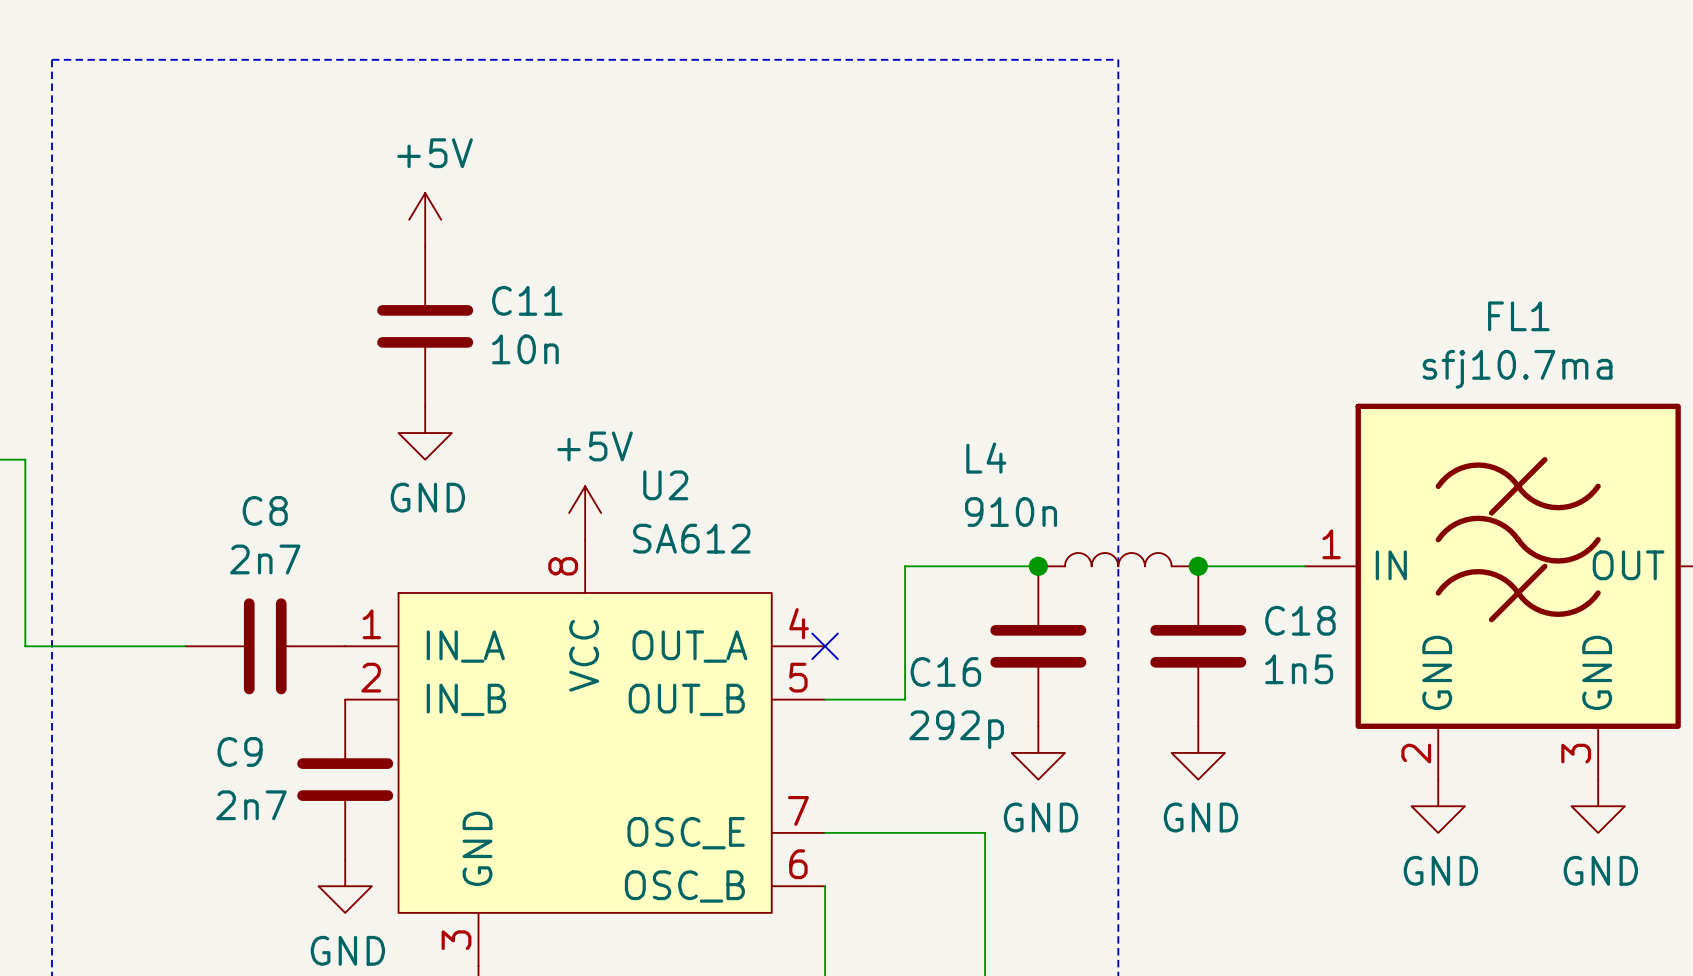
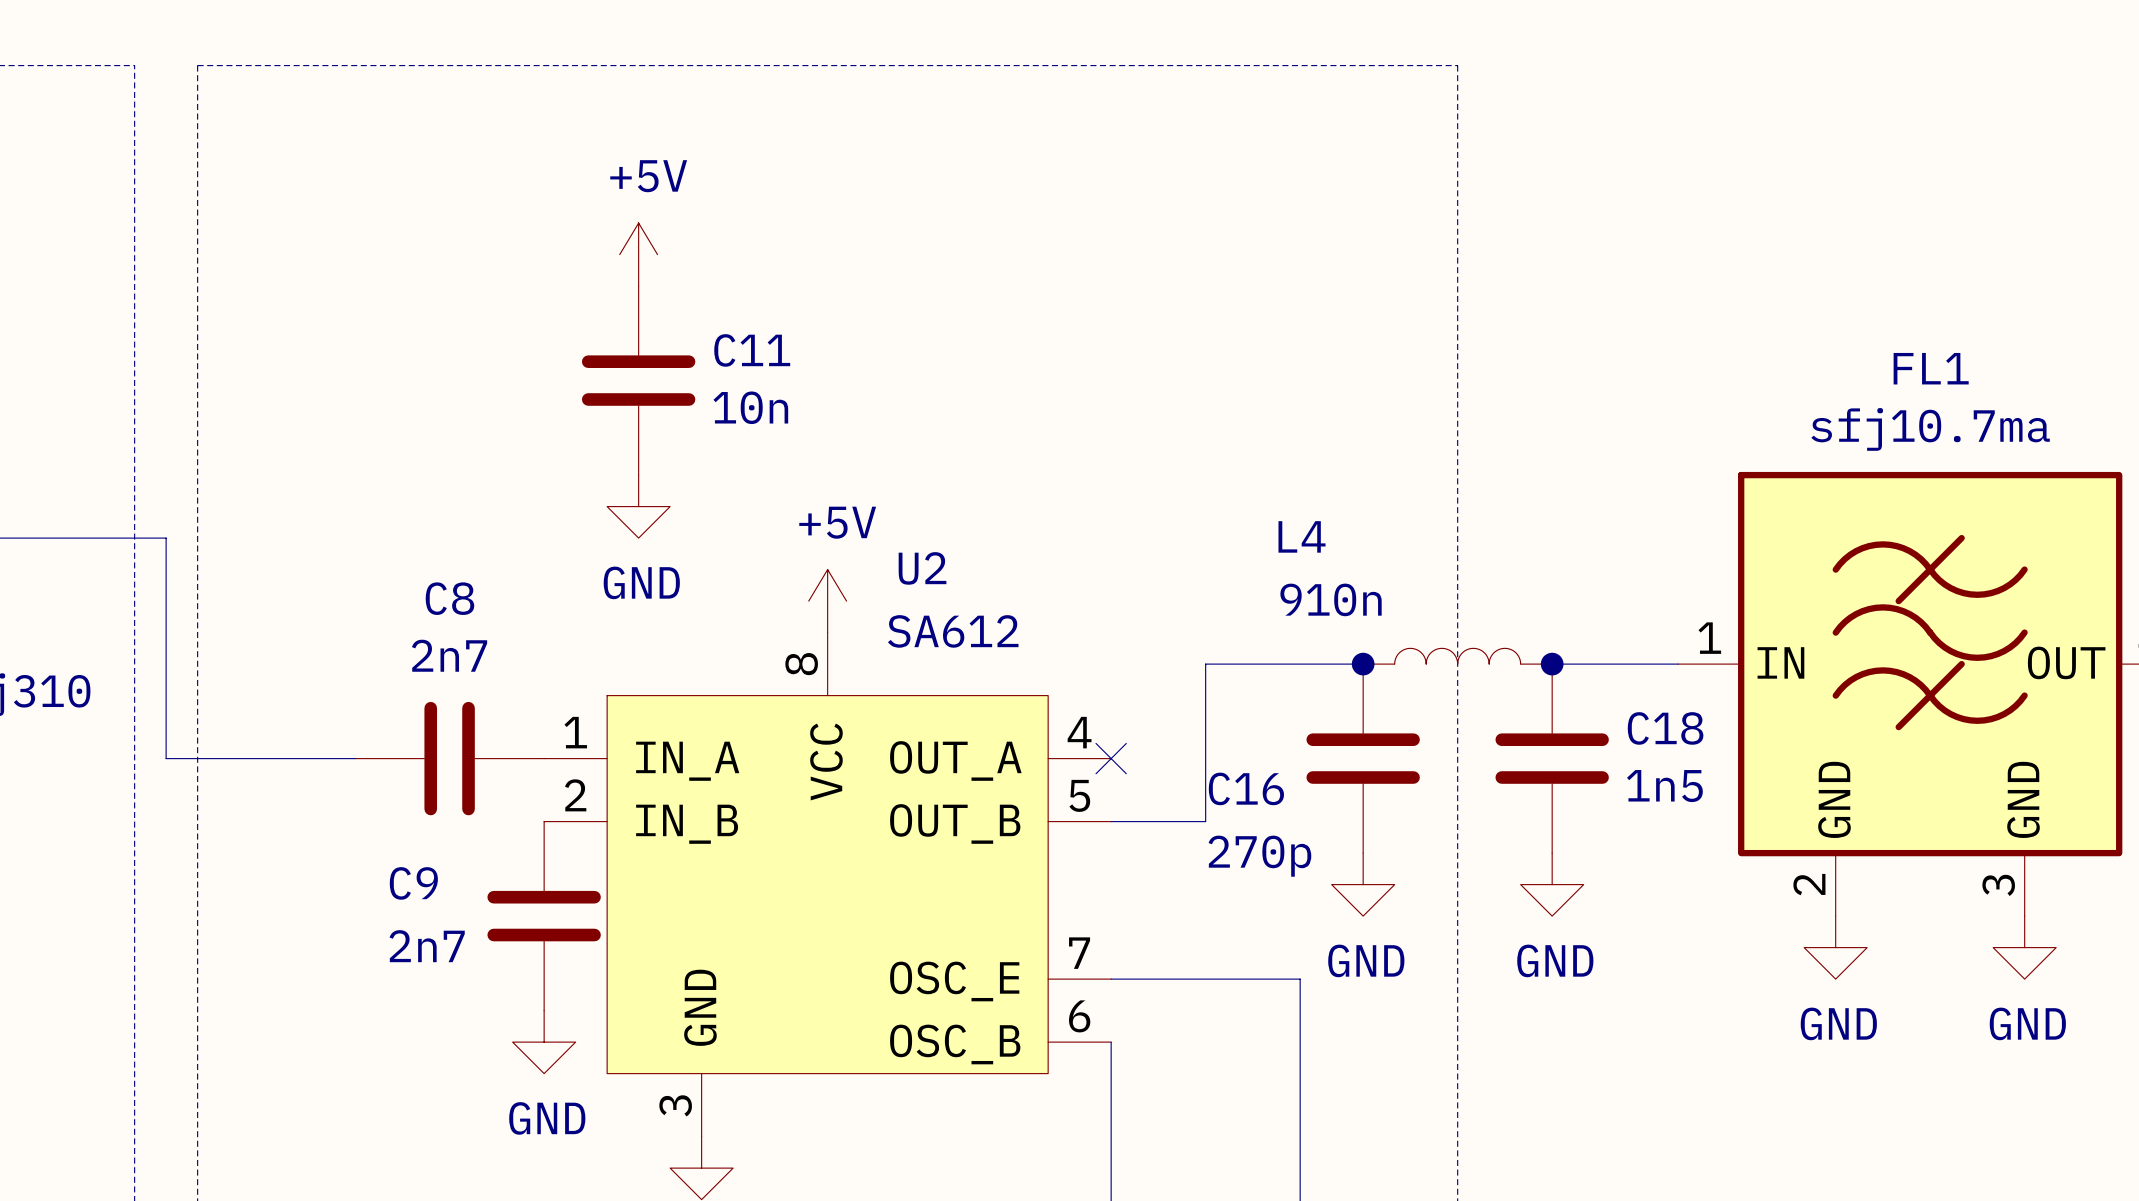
C16 value: 292p (956, 729) -> 270p (1259, 856)

